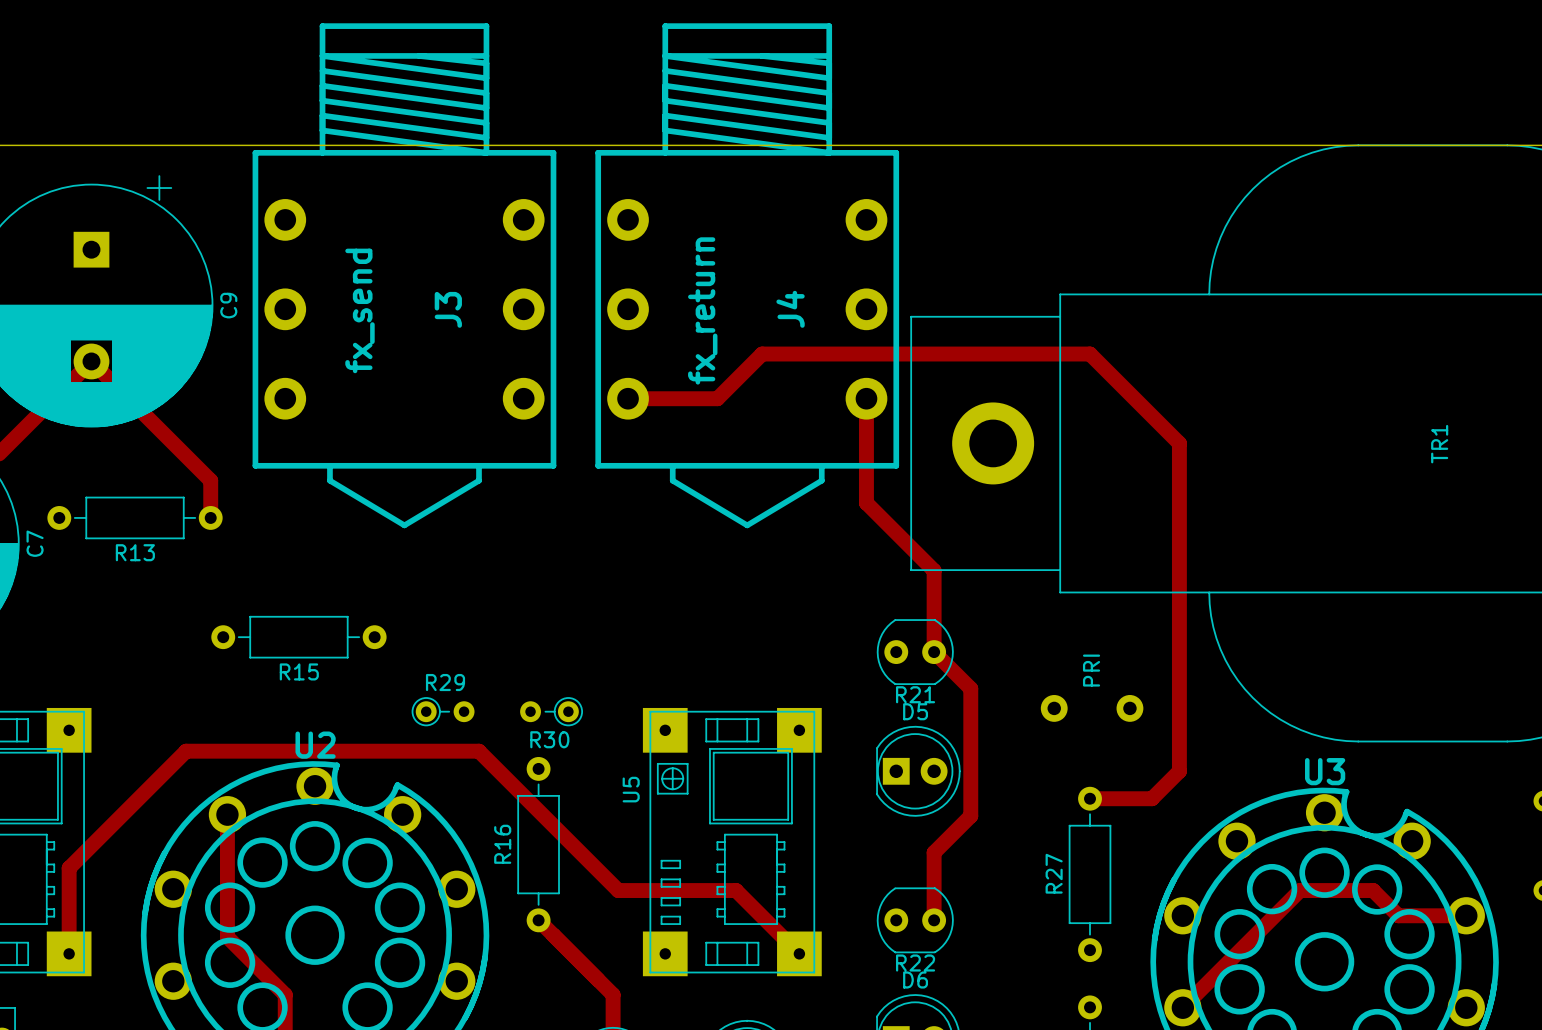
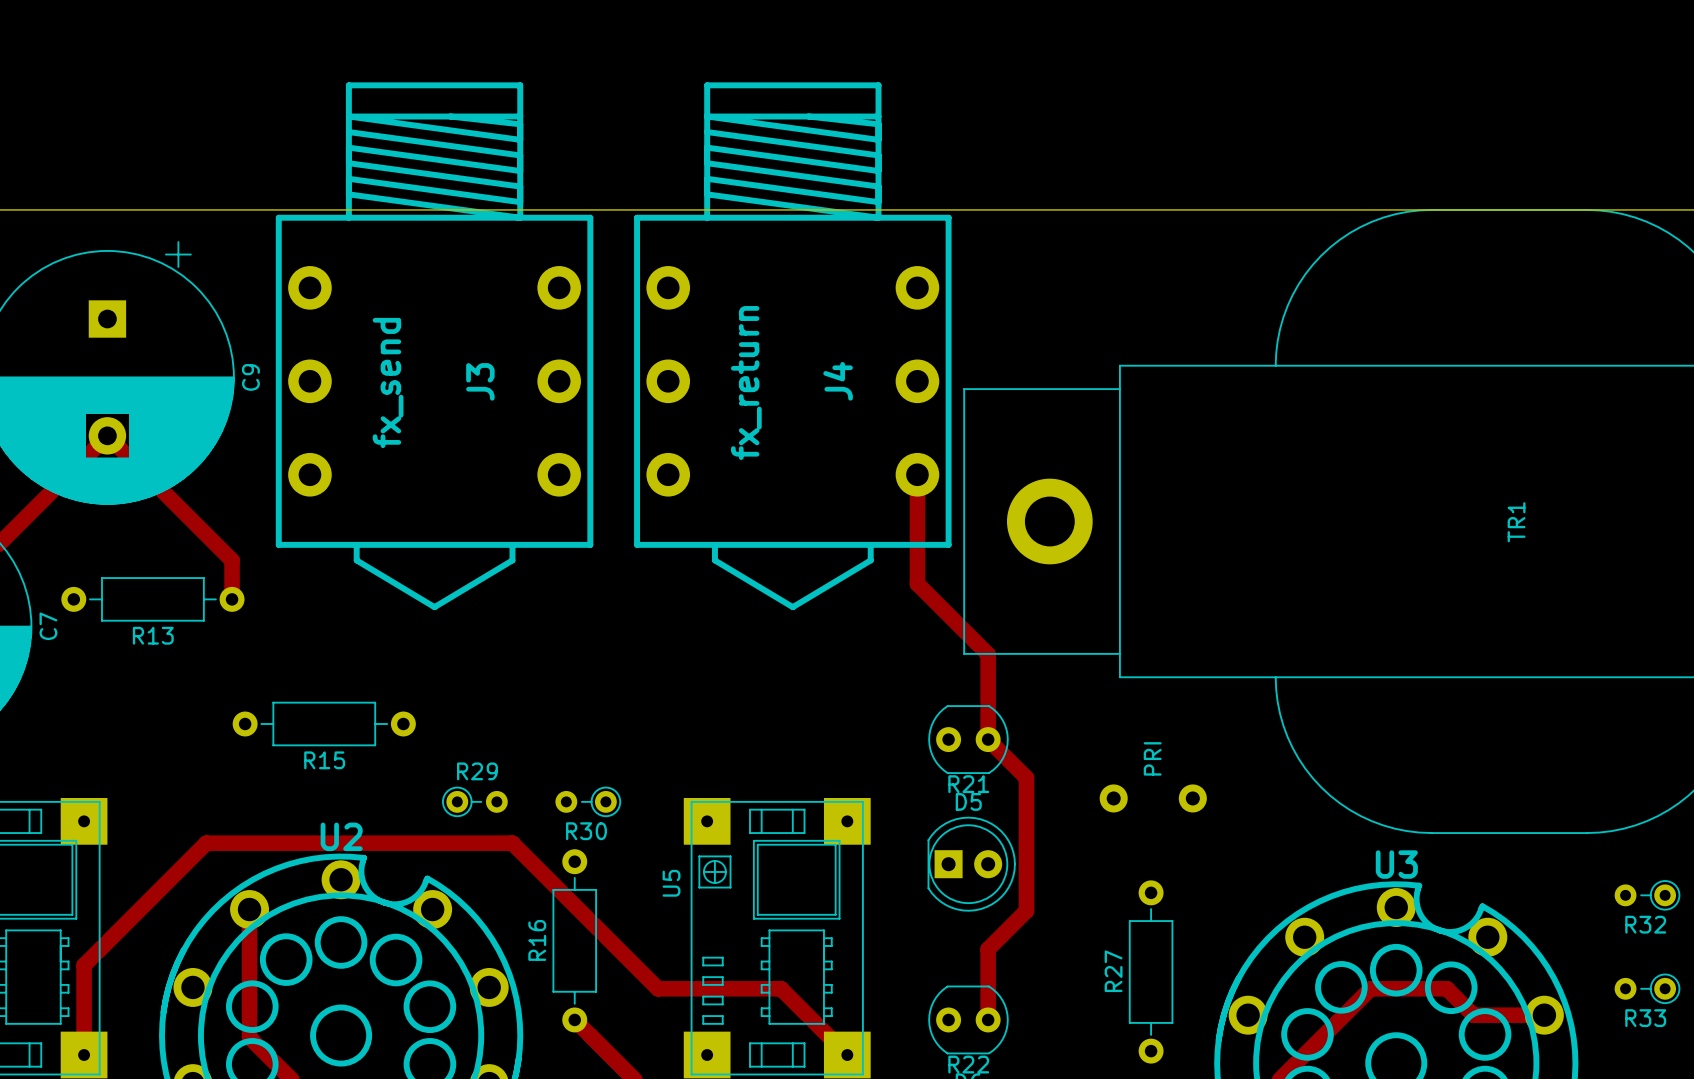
track: (628, 398) (717, 398) (762, 354) (1090, 354) (1179, 443) (1179, 771) (1152, 798) (1090, 798) -> none

